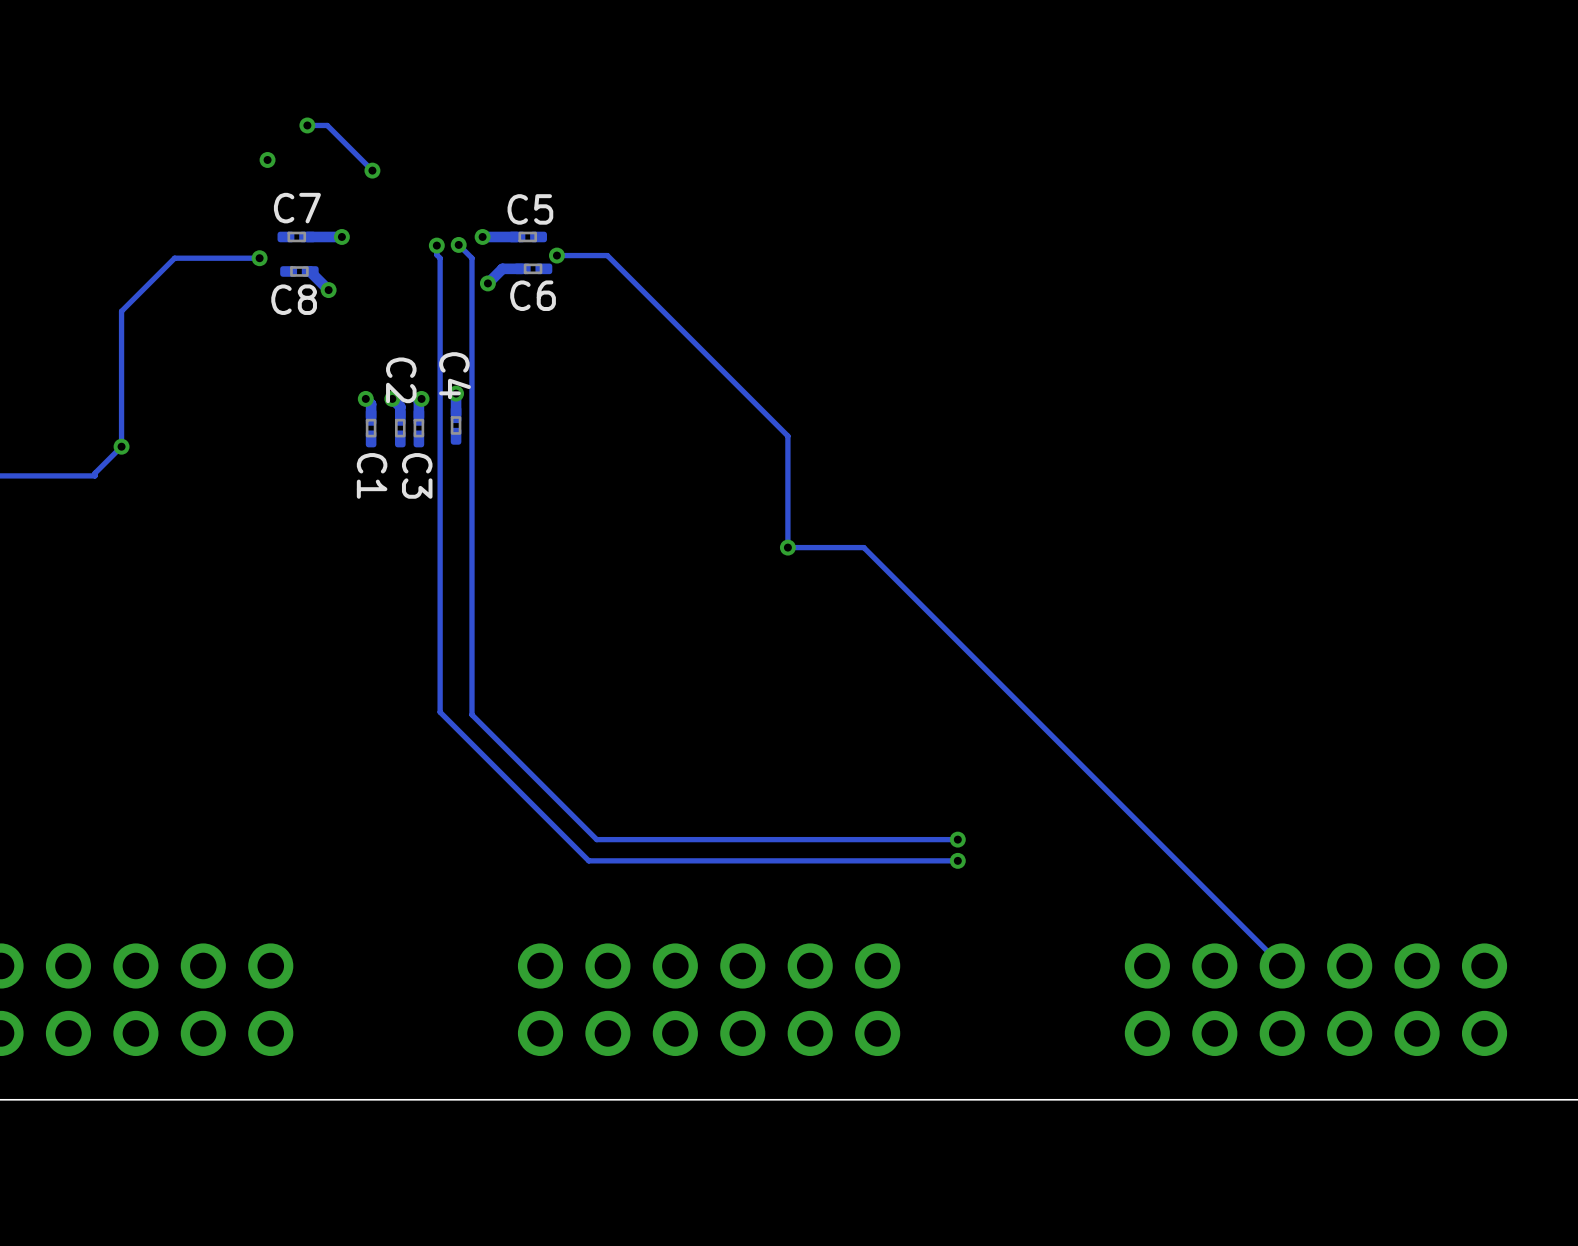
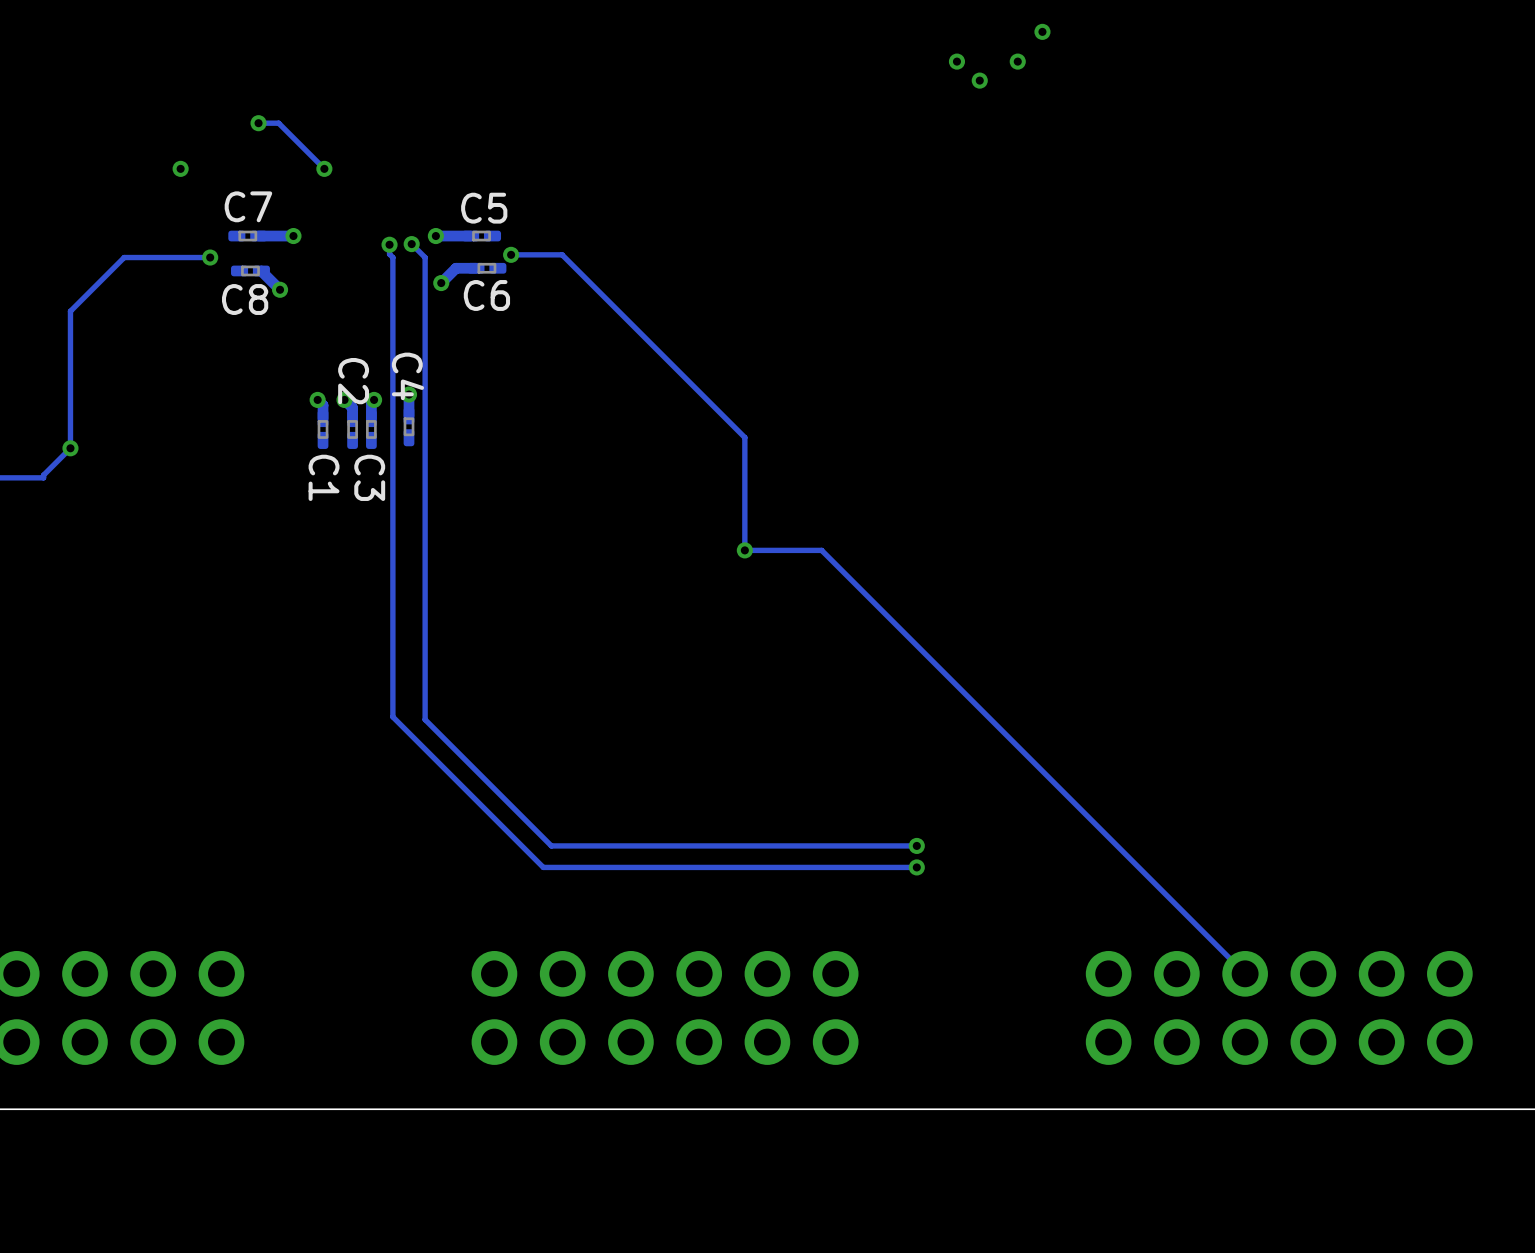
via: none -> (1042, 31)
via: none -> (956, 61)
via: none -> (1017, 61)
via: none -> (979, 80)
via position: (267, 159) -> (180, 168)

